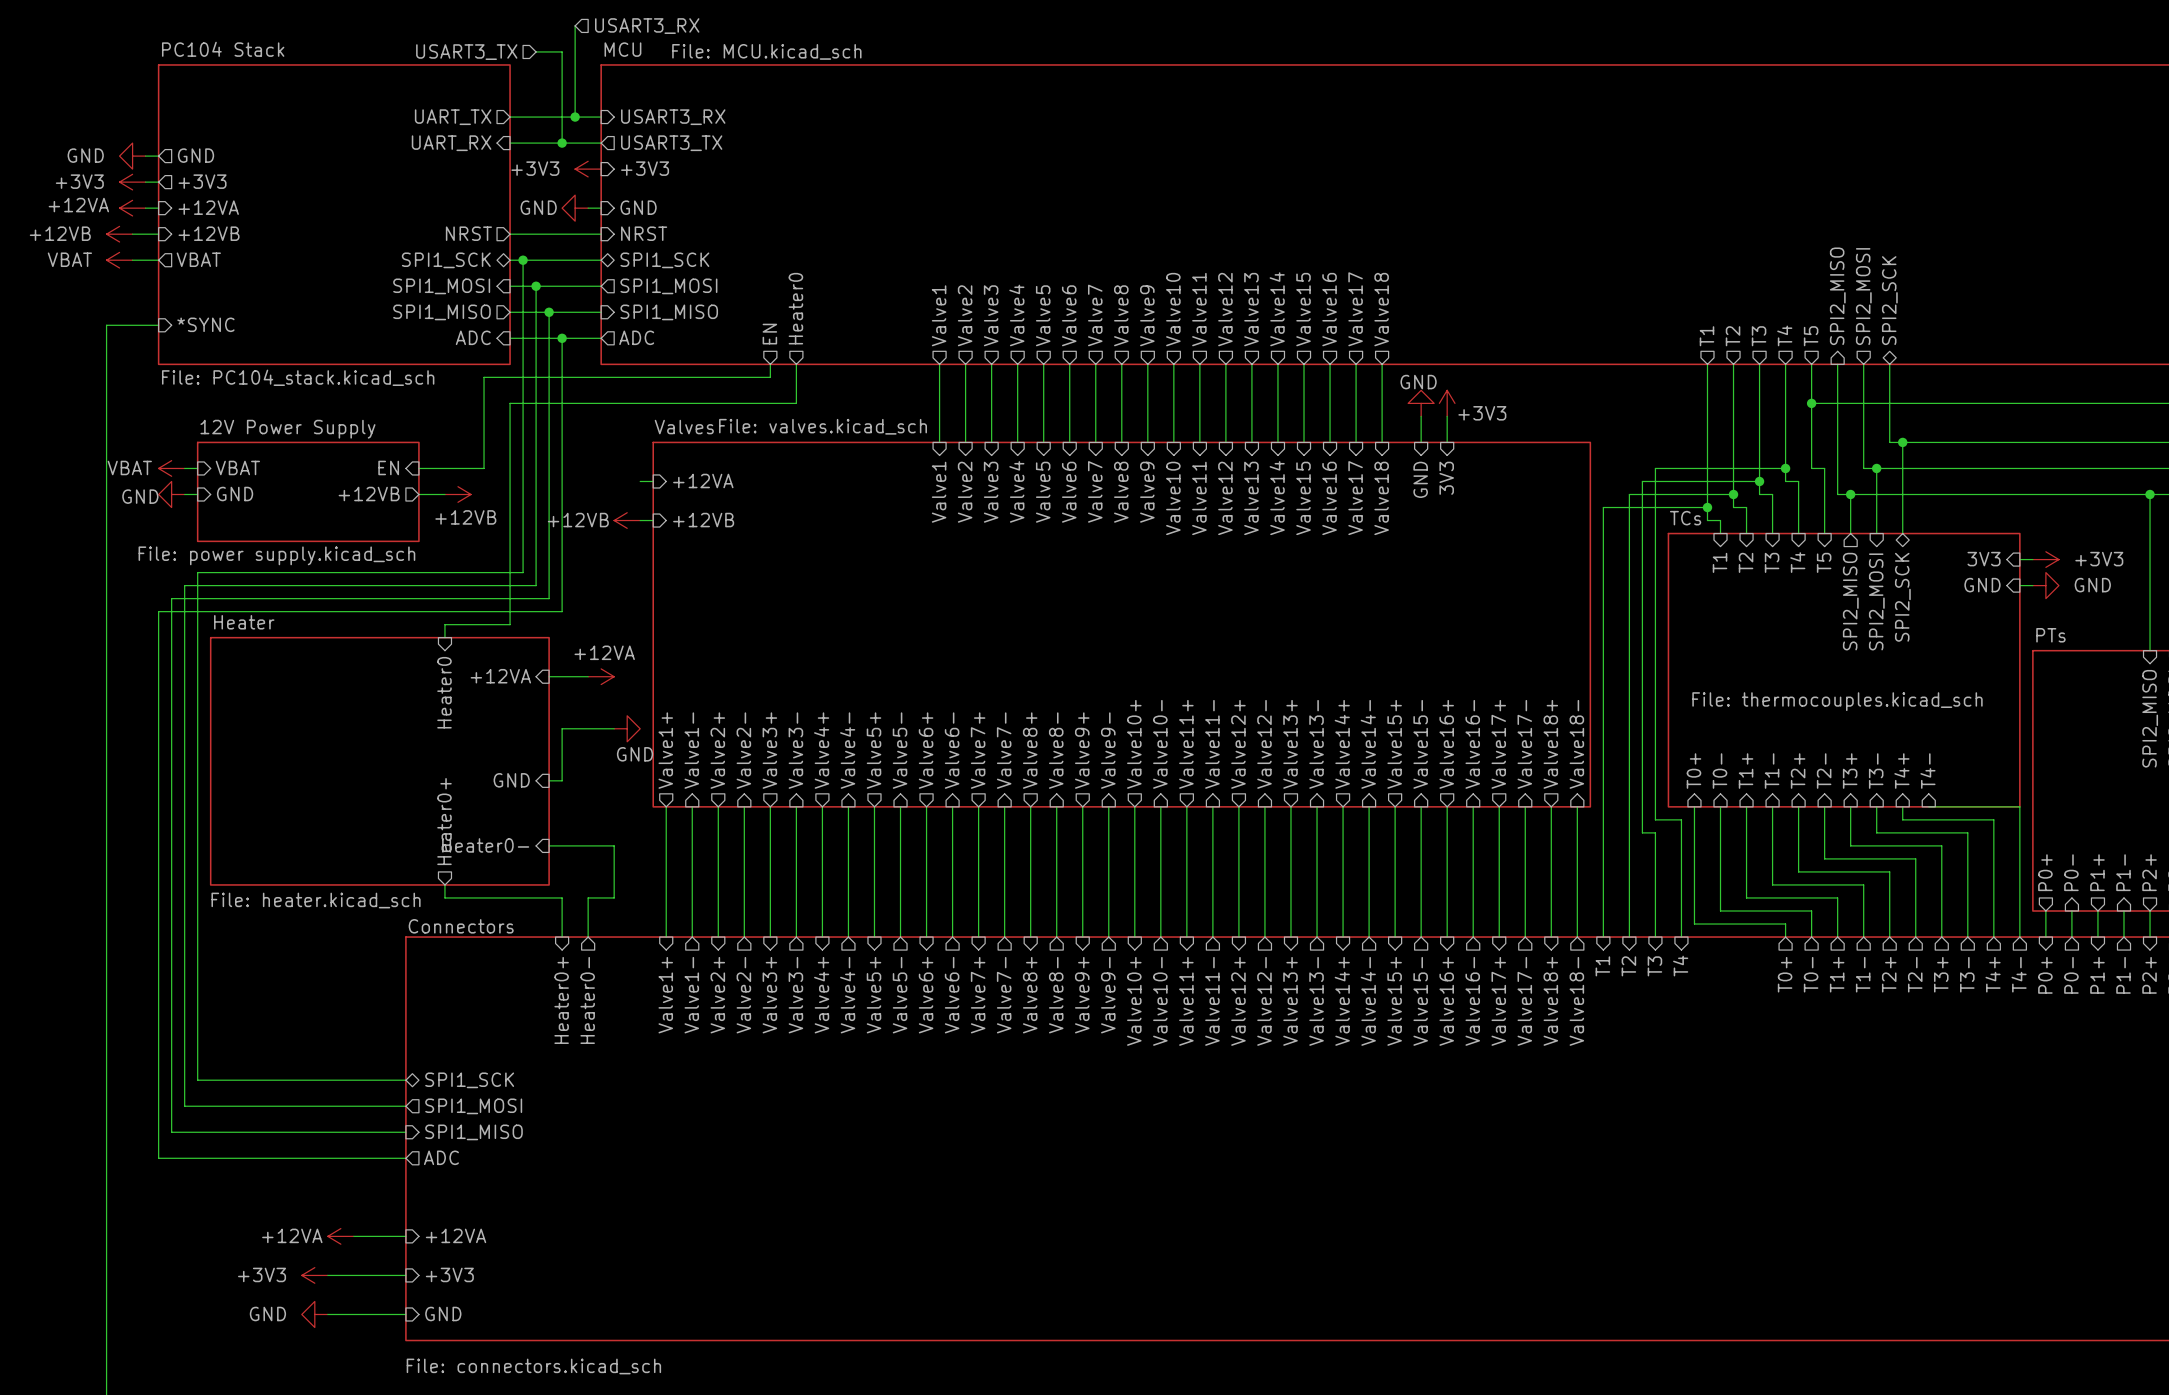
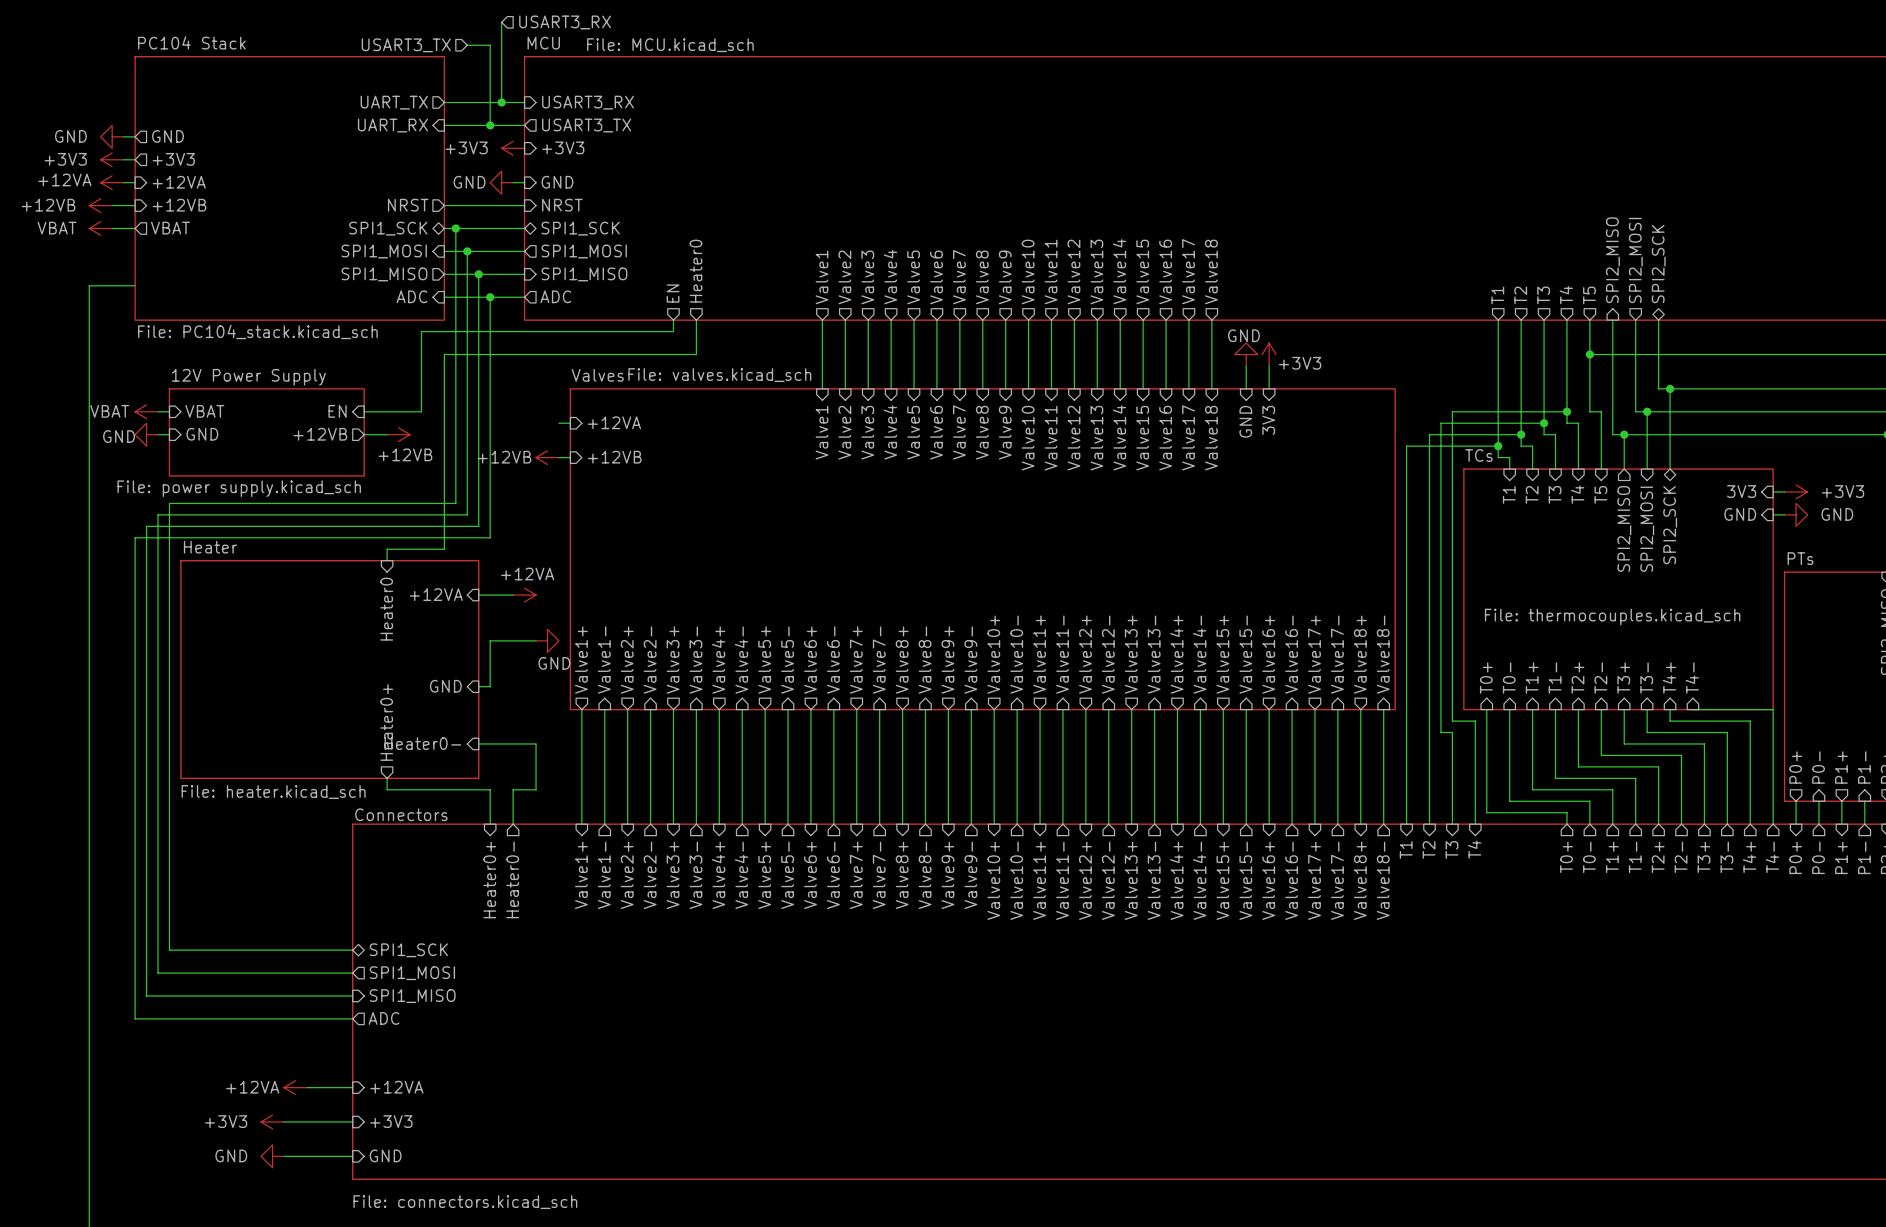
sheet pin: *SYNC (205, 324) -> none

